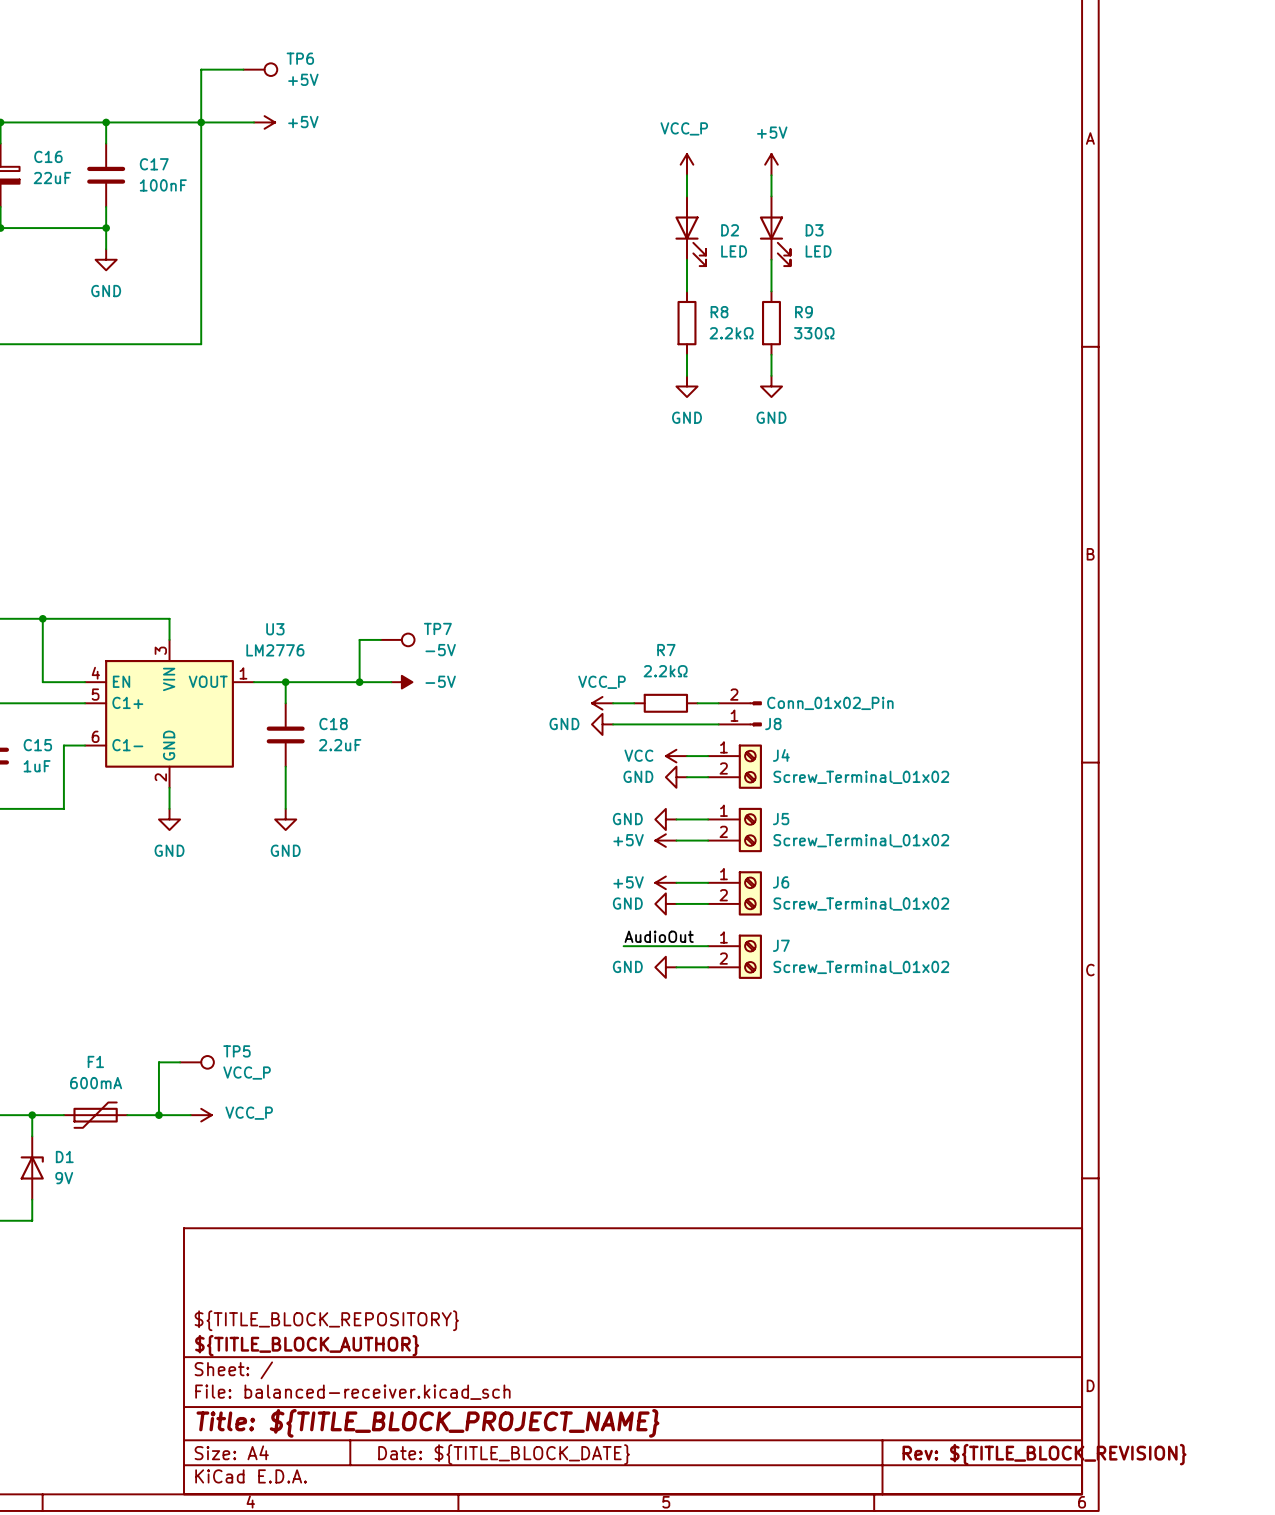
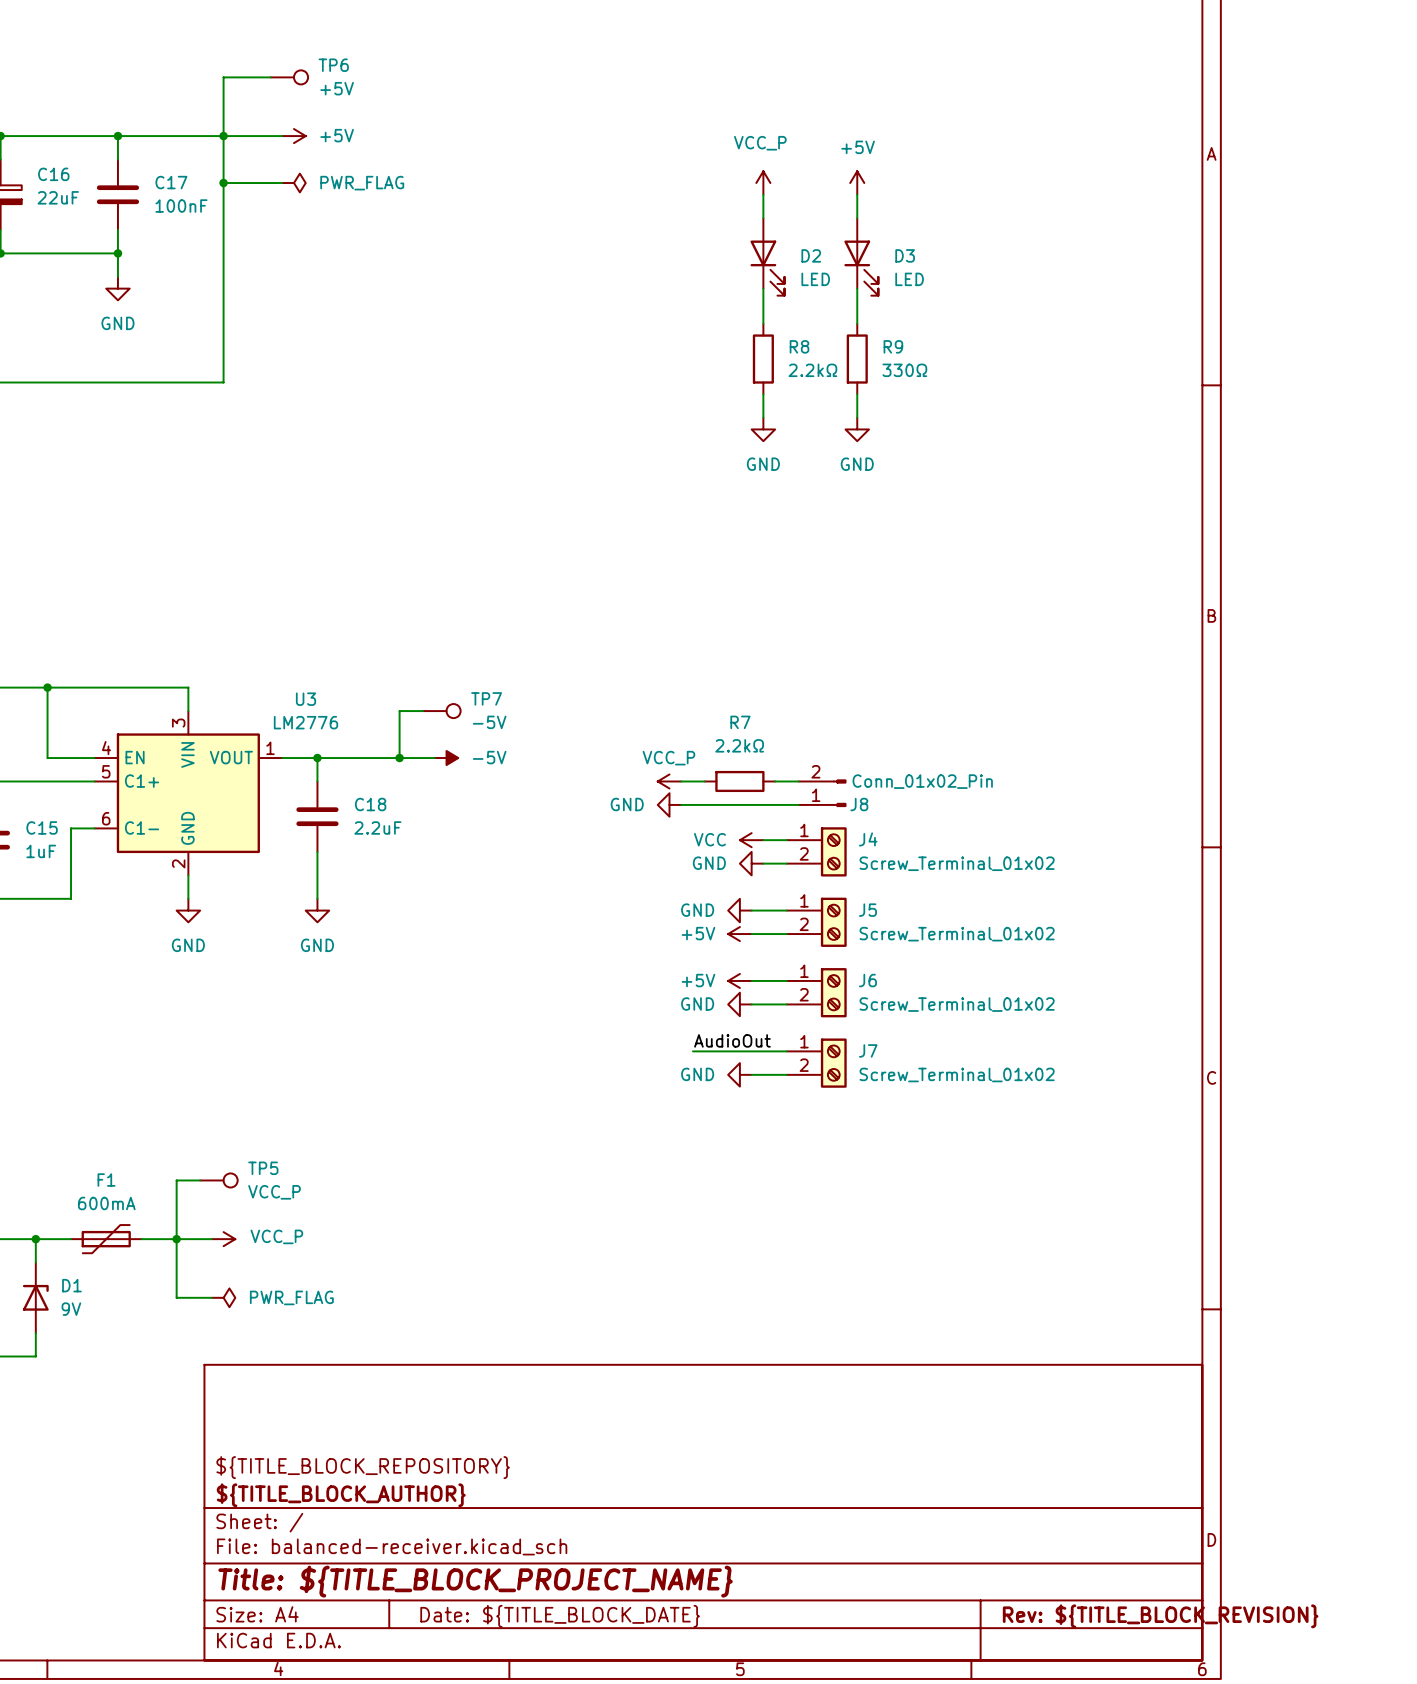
wire: none -> (223, 183) (282, 183)
junction: none -> (223, 183)
power symbol: none -> PWR_FLAG (293, 183)
wire: none -> (176, 1239) (176, 1297) (211, 1297)
power symbol: none -> PWR_FLAG (223, 1297)

